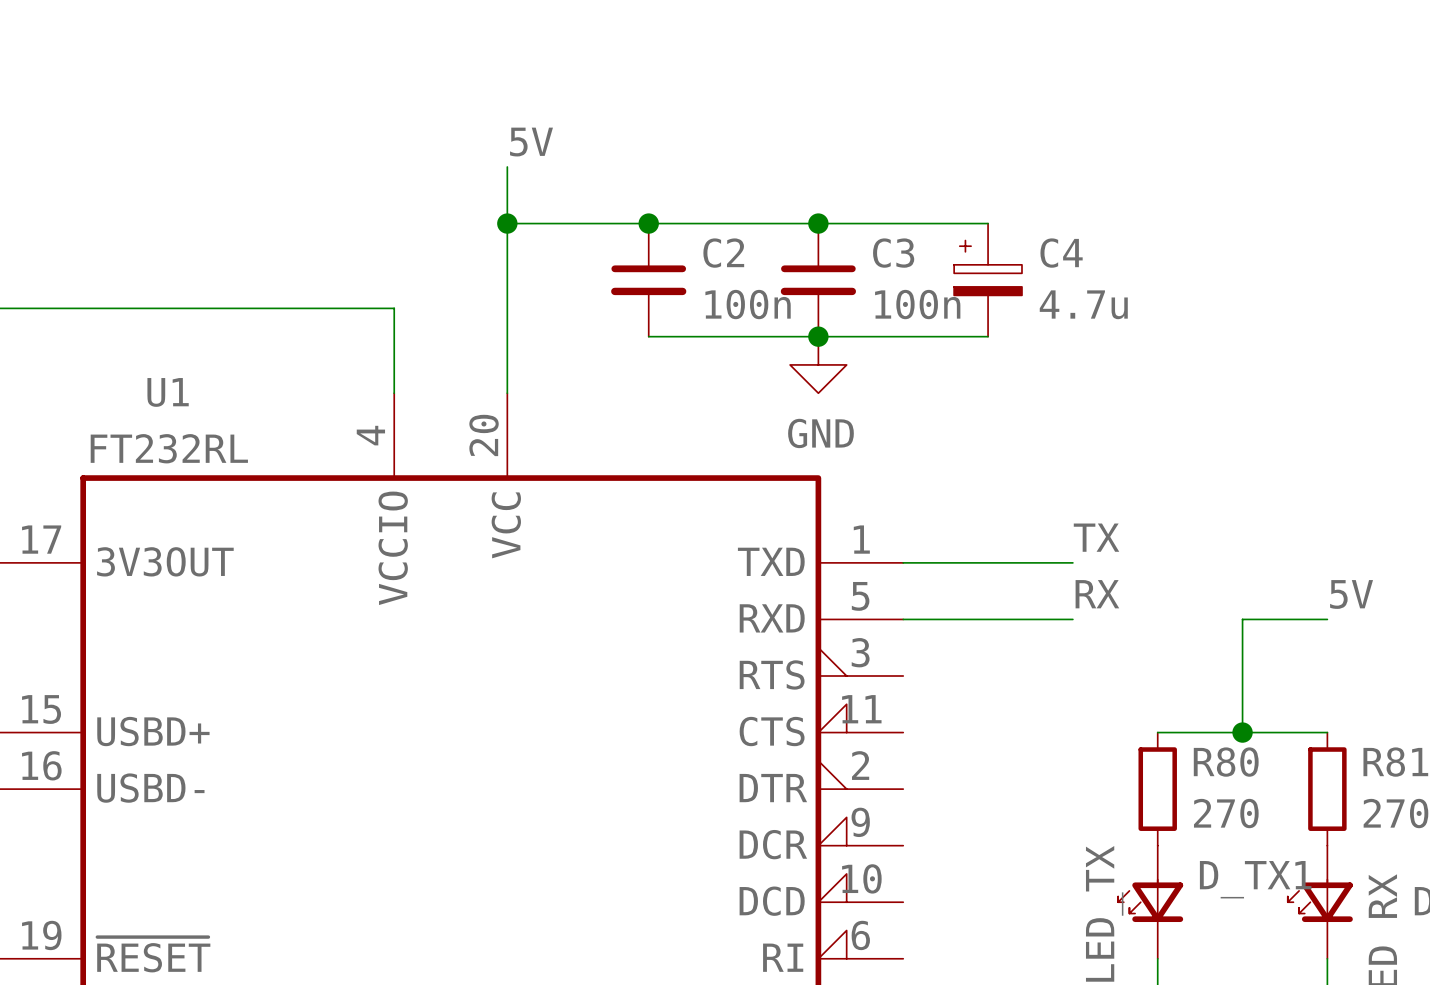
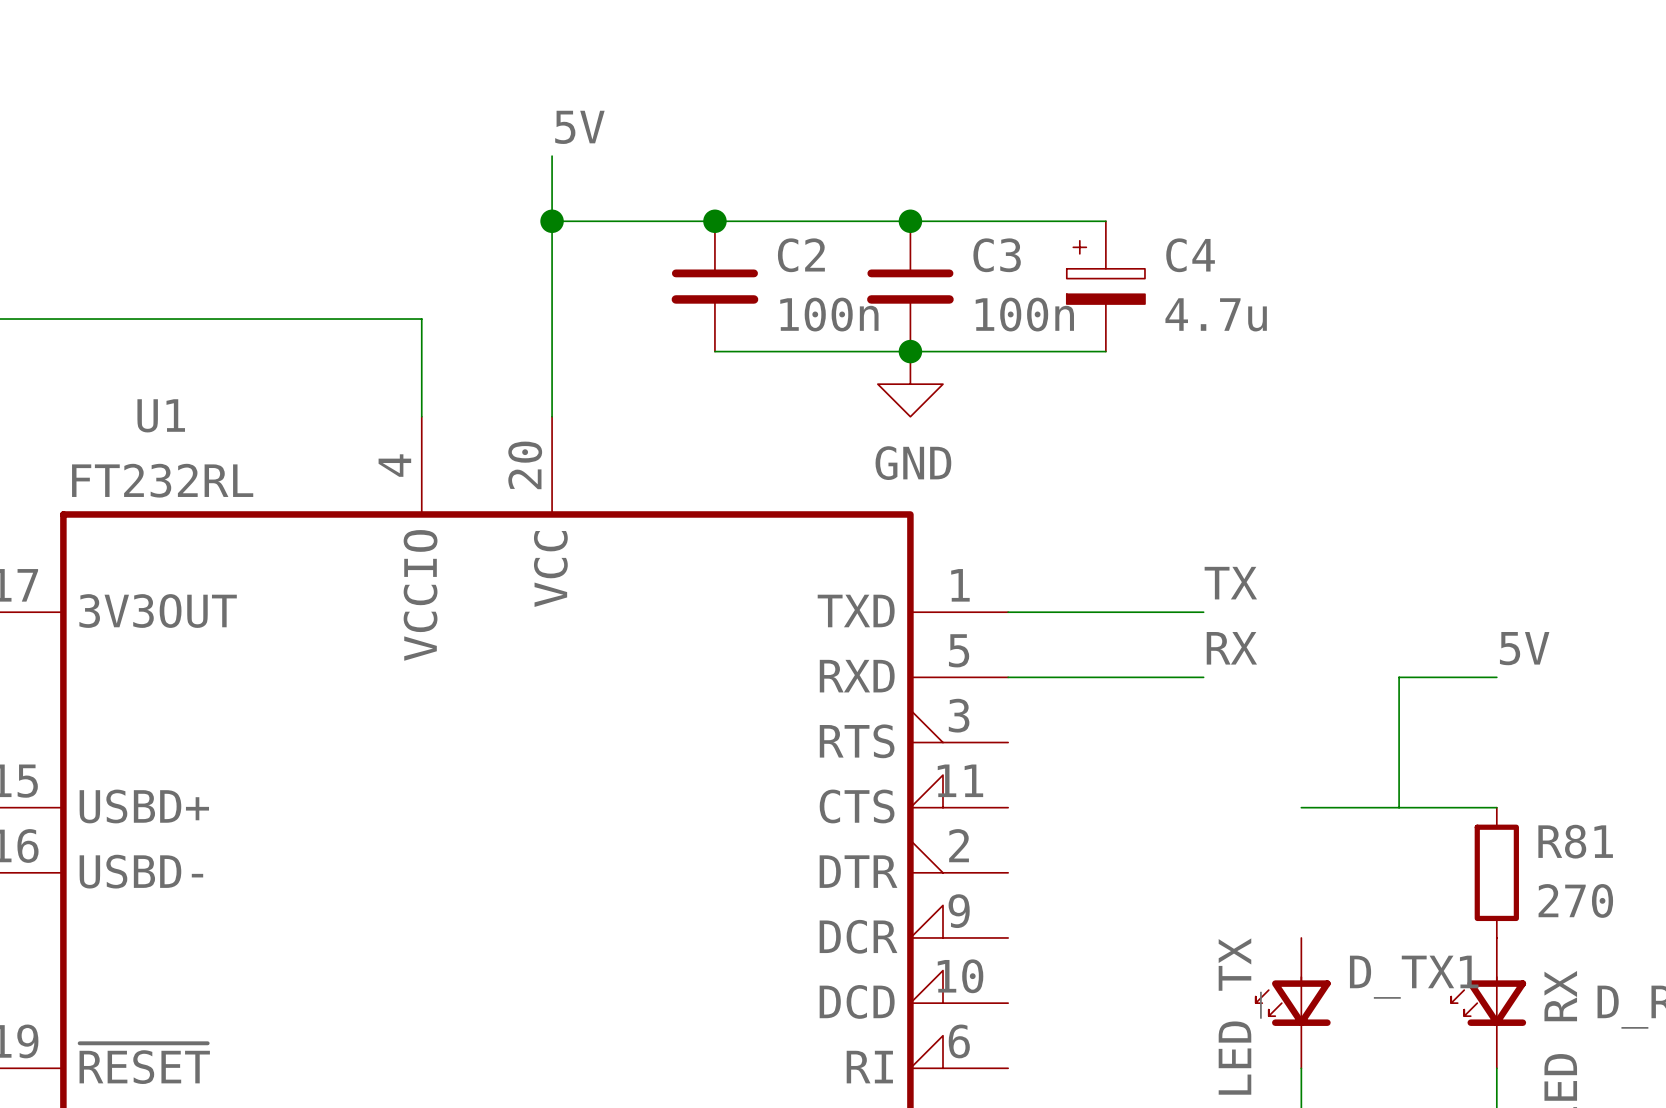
junction: (1242, 732) -> none
R80: 270 (1157, 789) -> none

